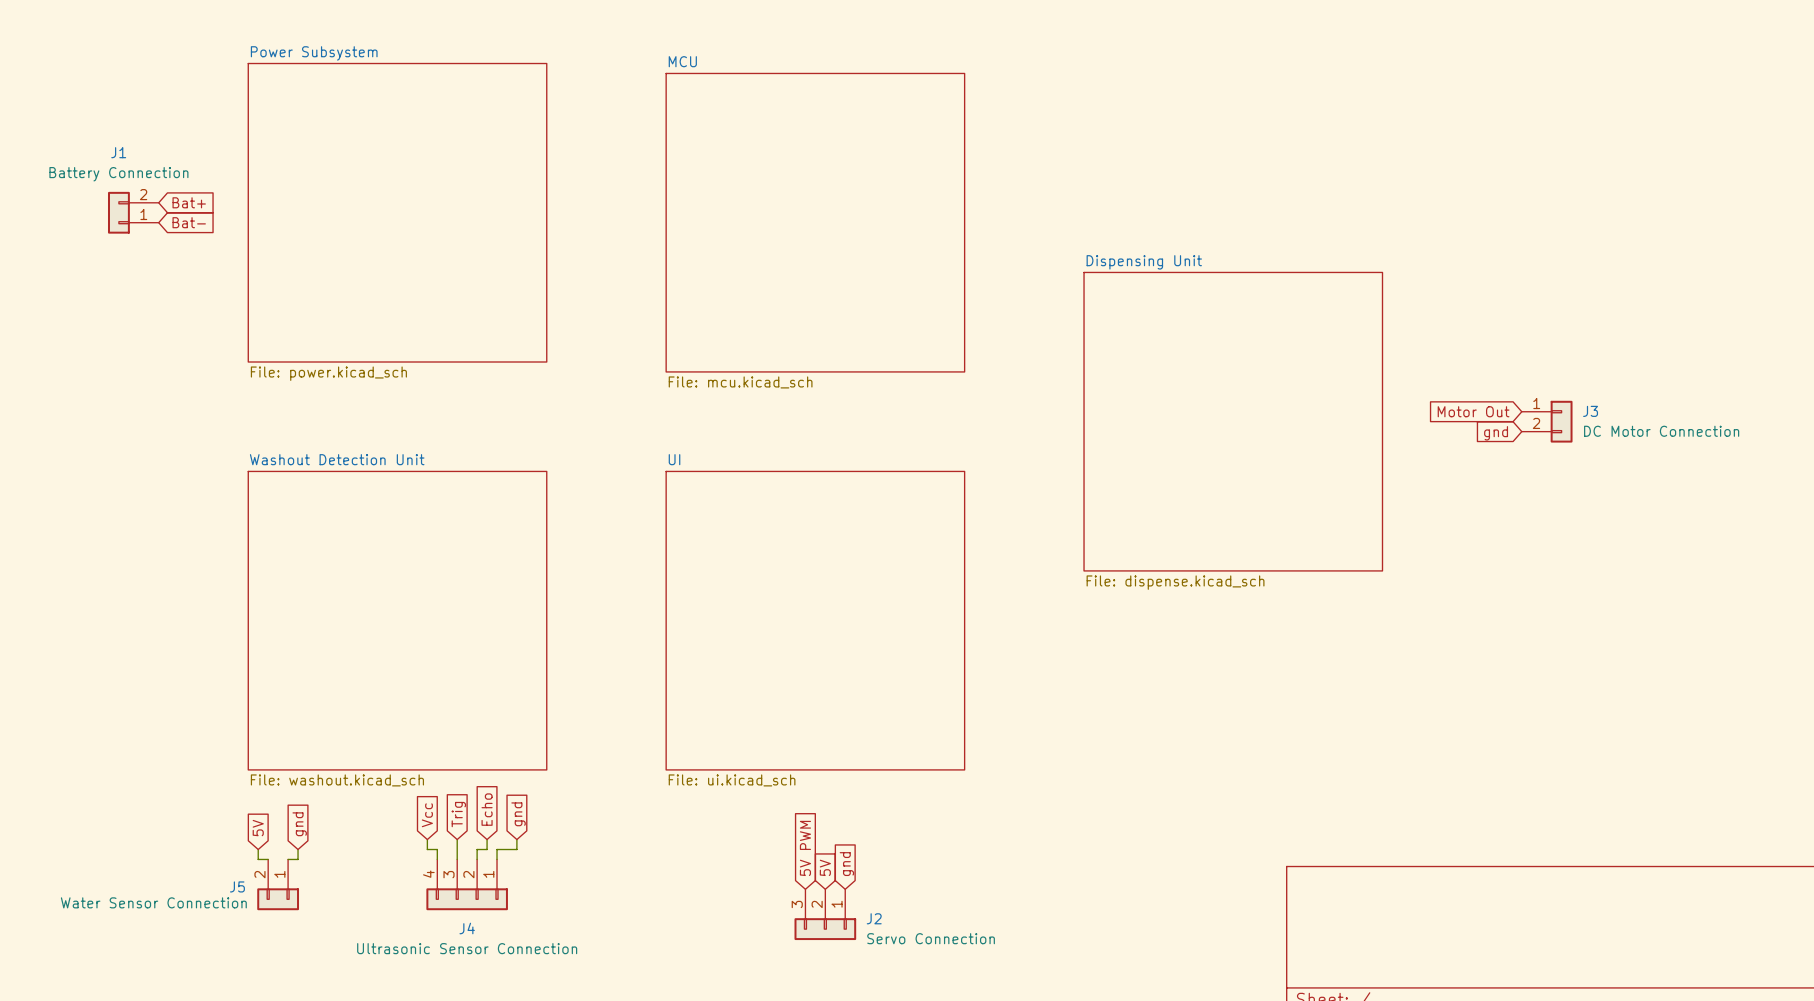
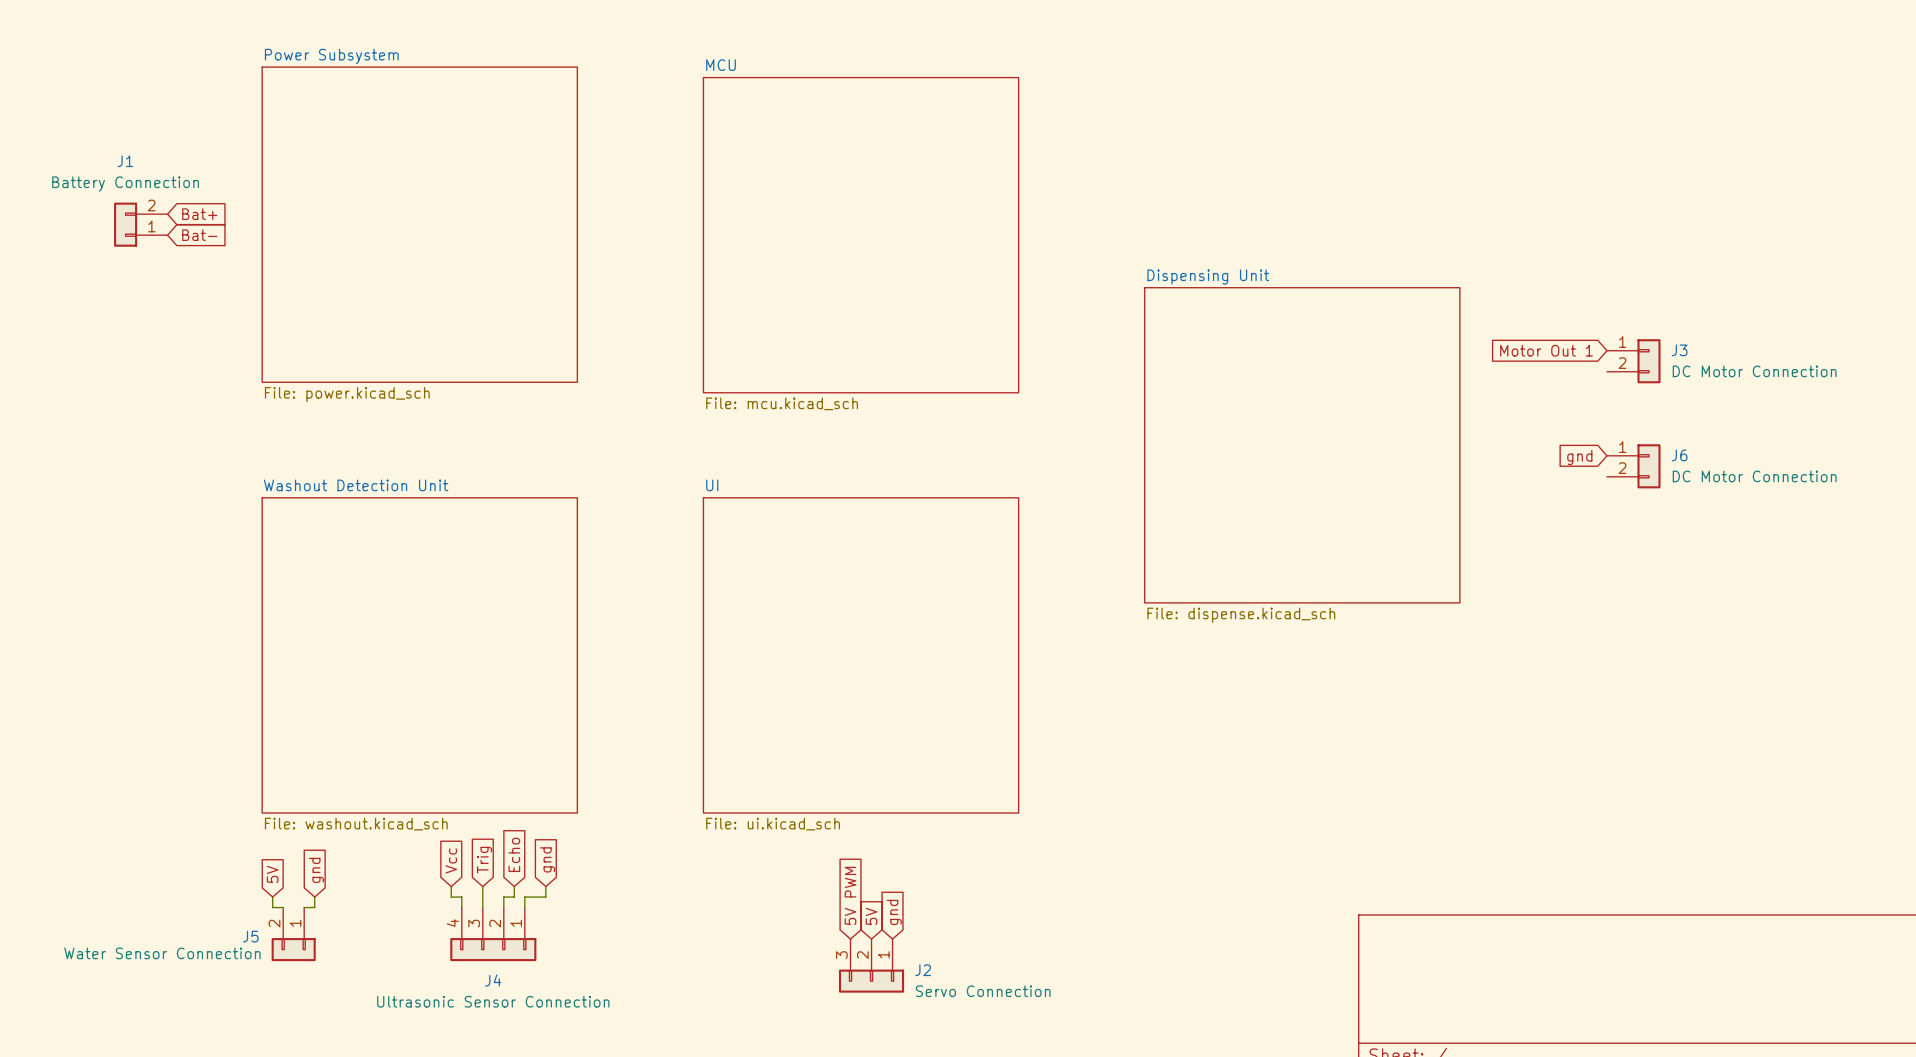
global label: none -> Motor Out 1 (1546, 350)
global label: Motor Out (1473, 411) -> none
J3 position: (1547, 421) -> (1633, 361)
J6: none -> DC Motor Connection (1633, 466)

